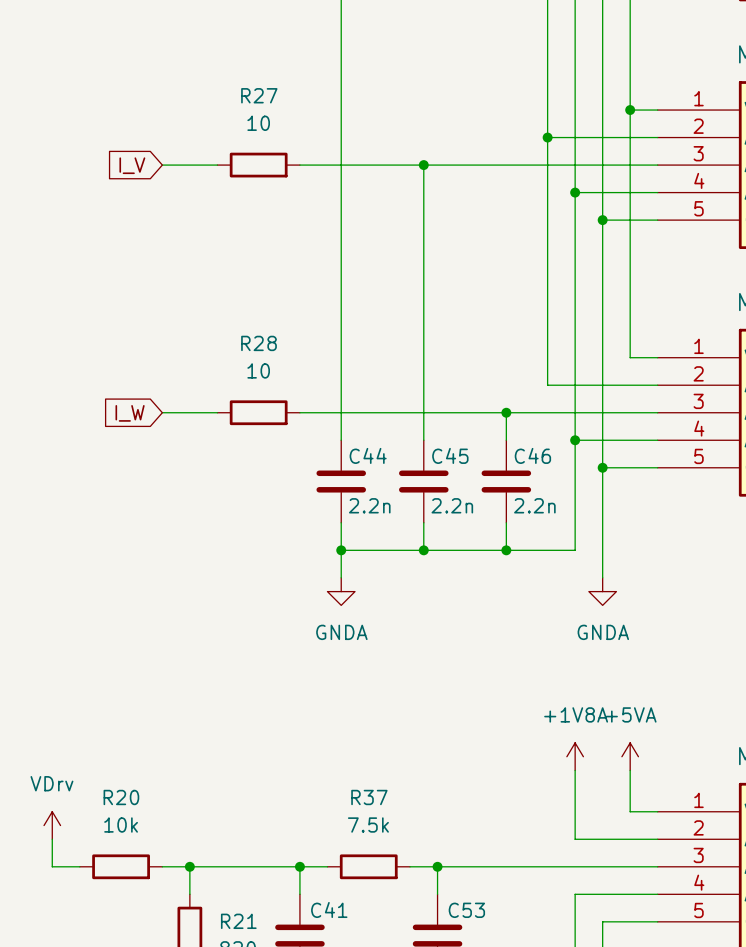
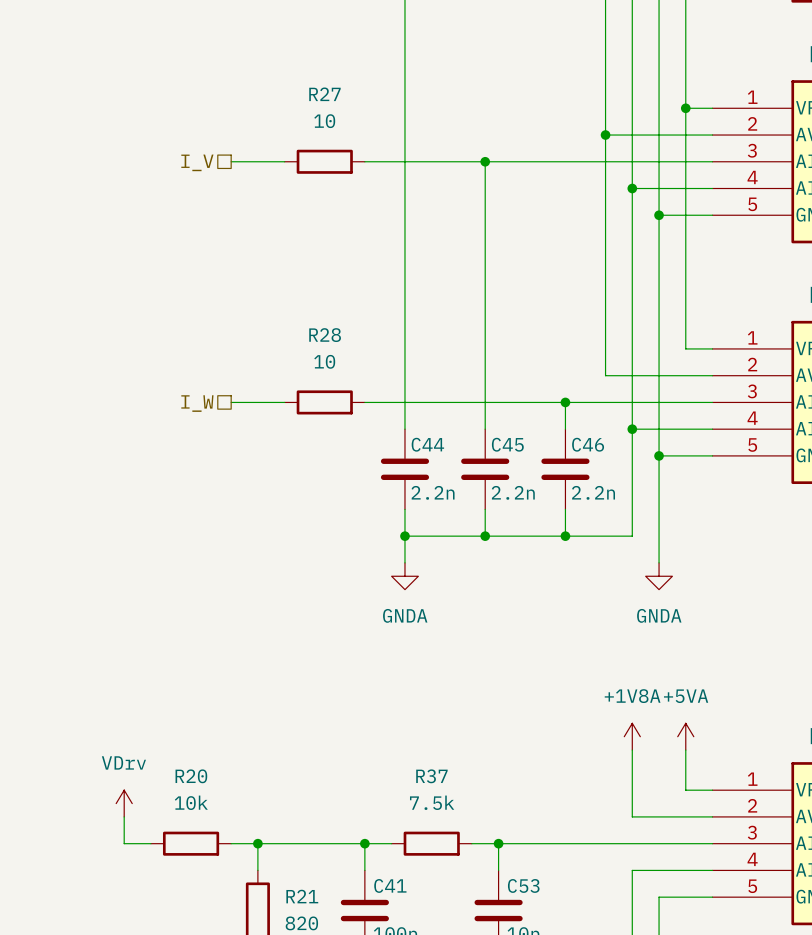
hierarchical label: none -> I_V (197, 162)
global label: I_V (132, 165) -> none
hierarchical label: none -> I_W (197, 403)
global label: I_W (130, 413) -> none

